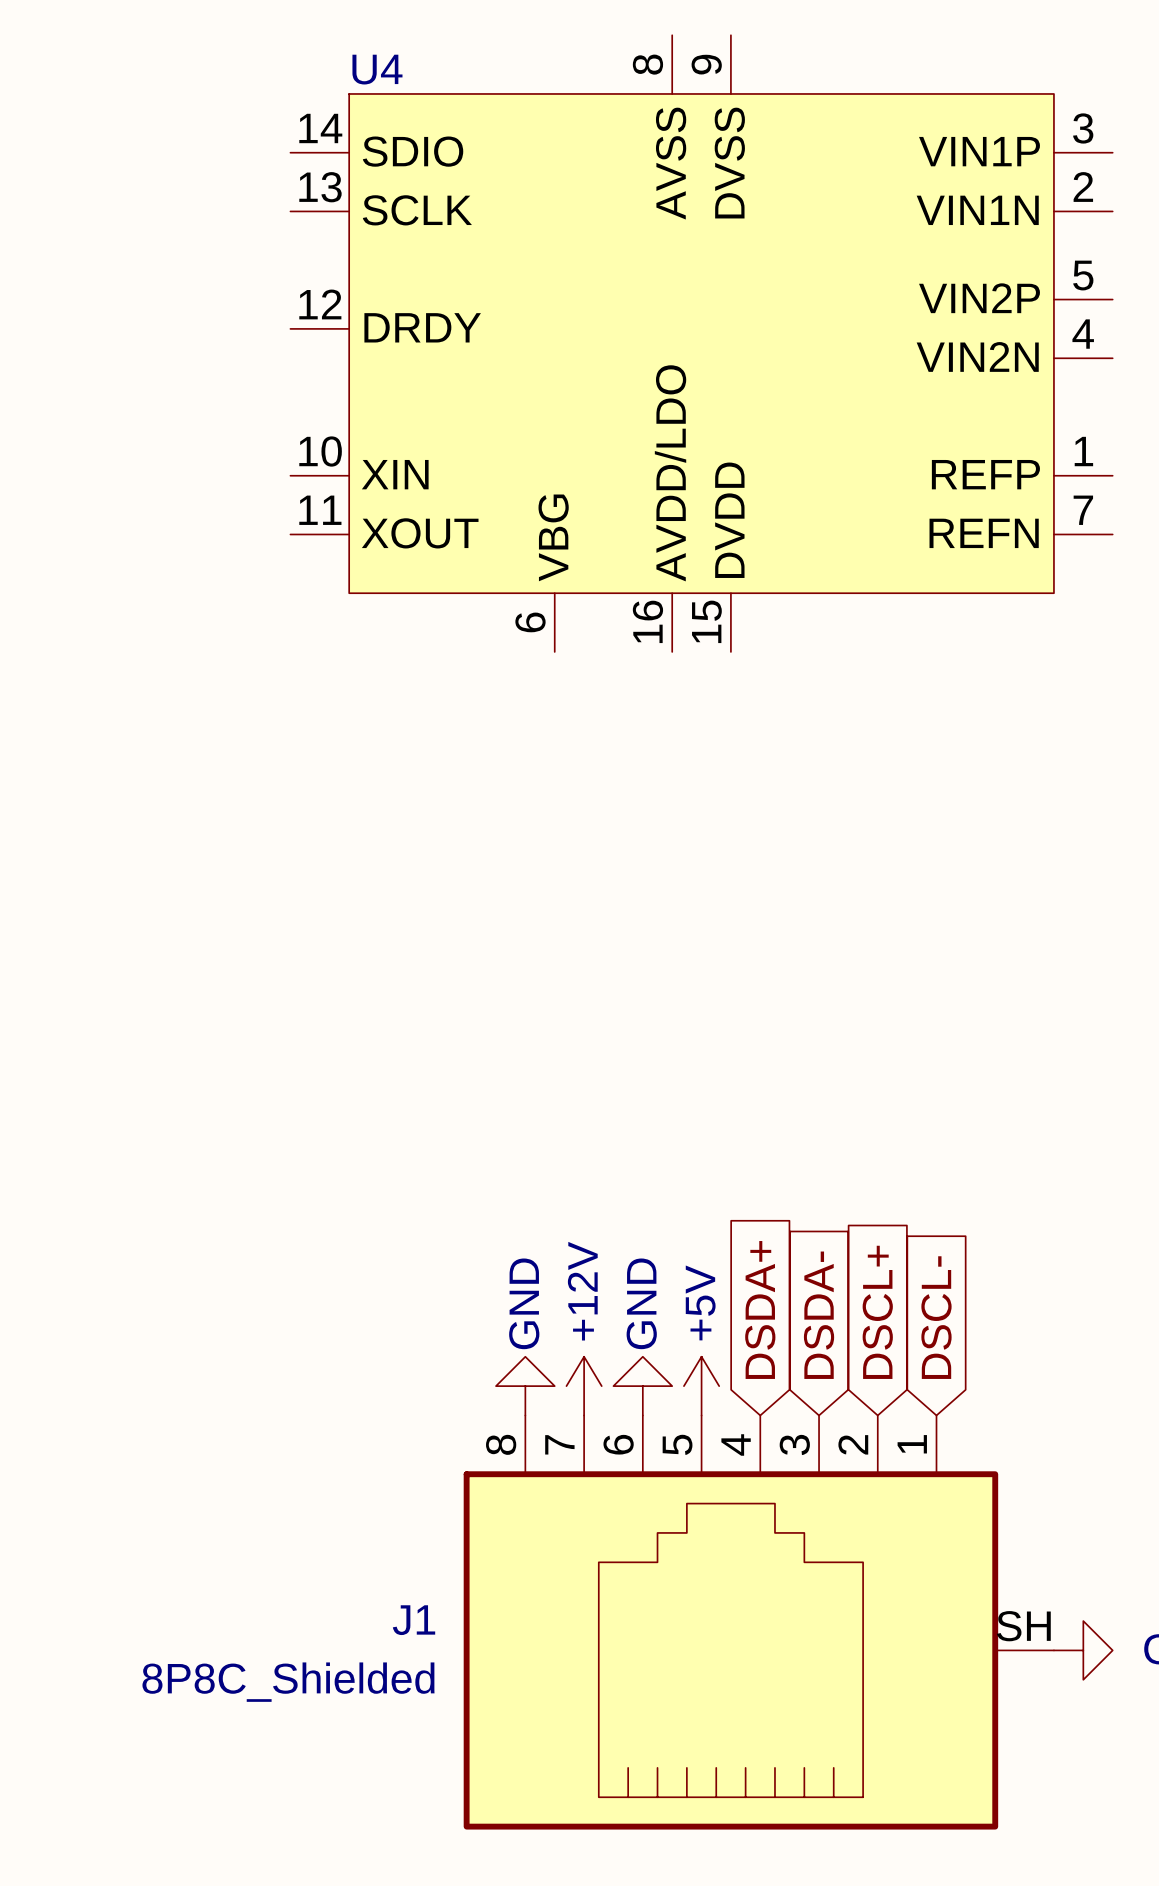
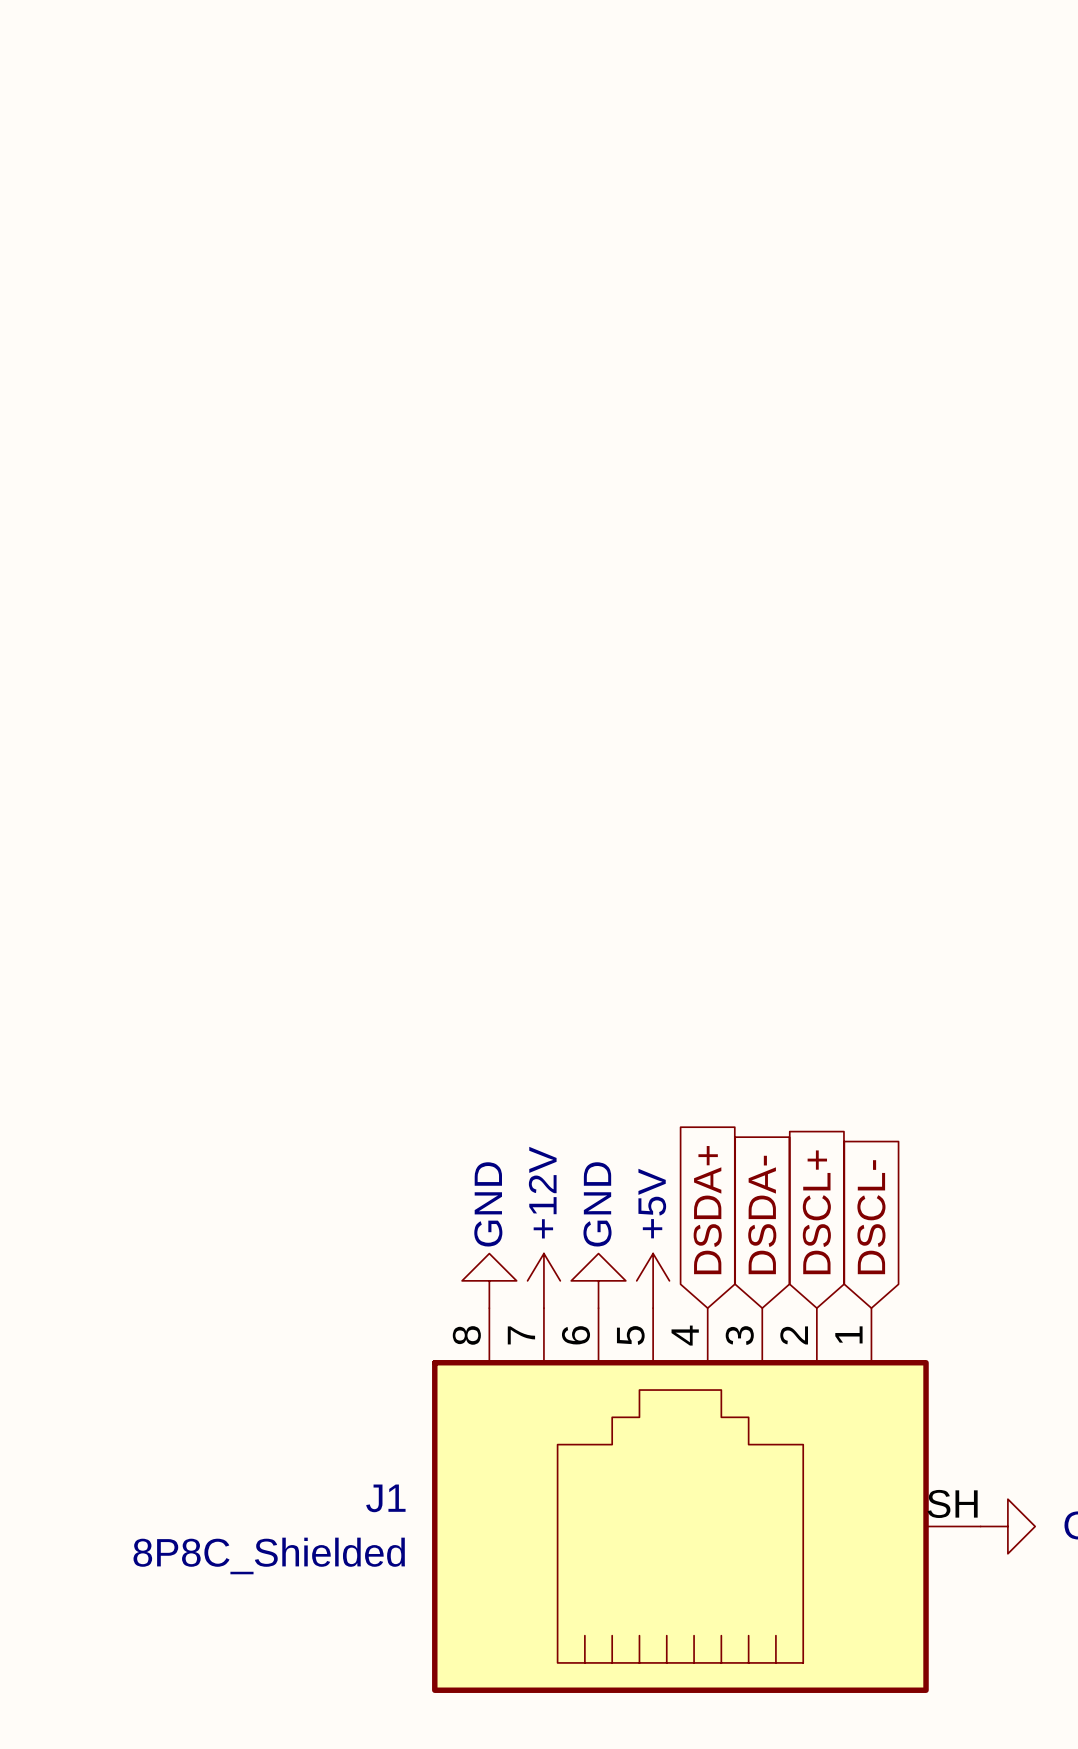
U4: (701, 343) -> none

